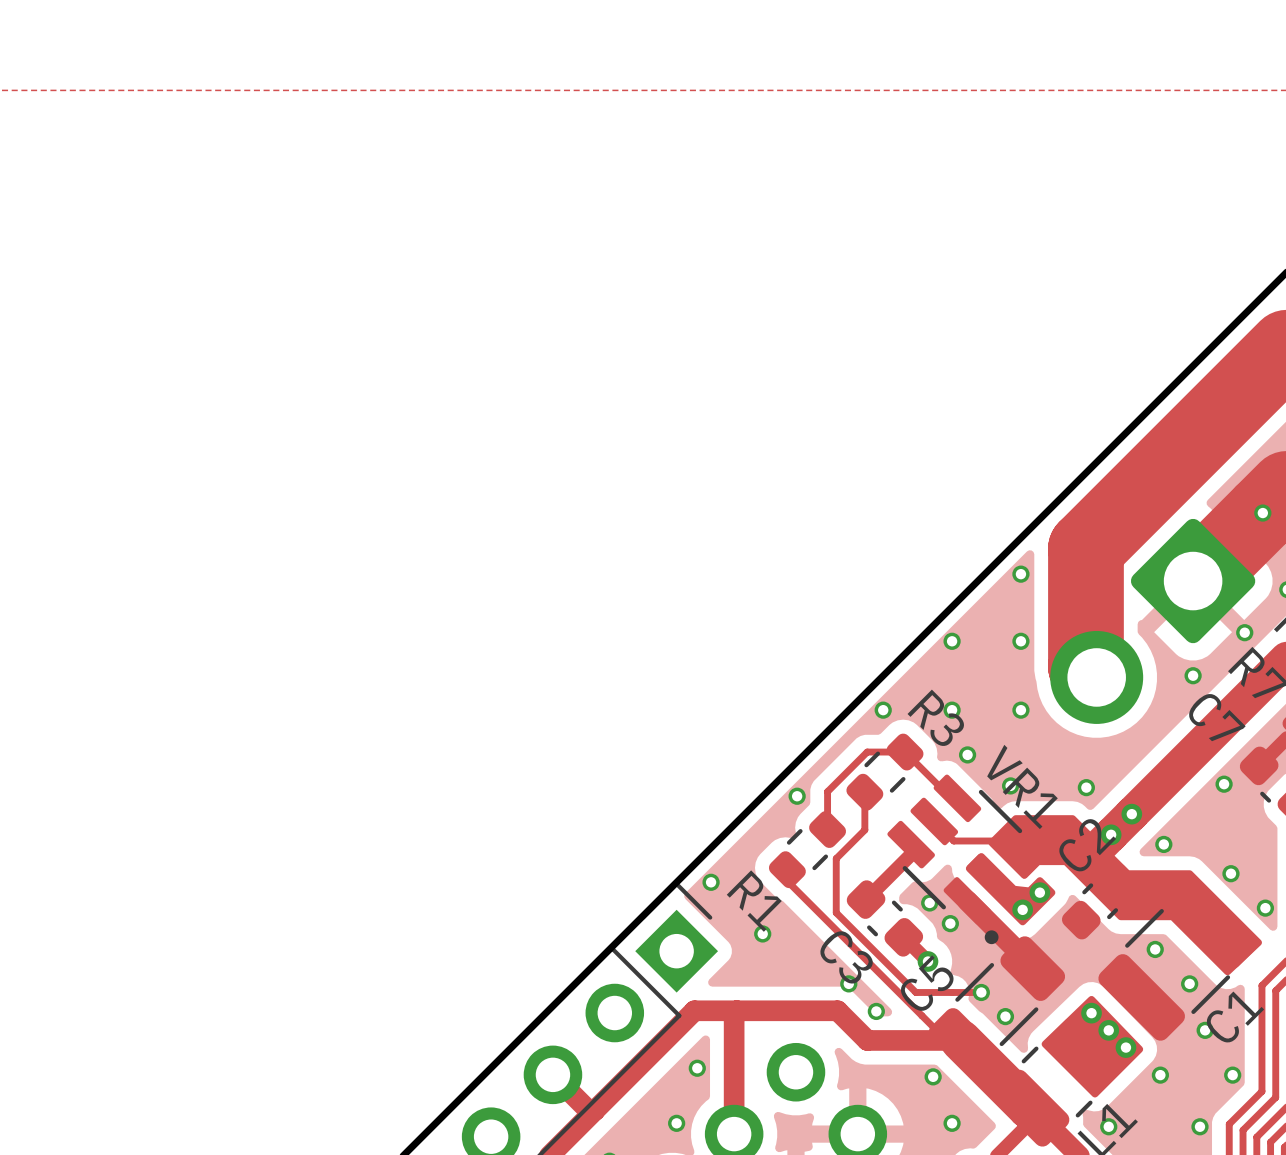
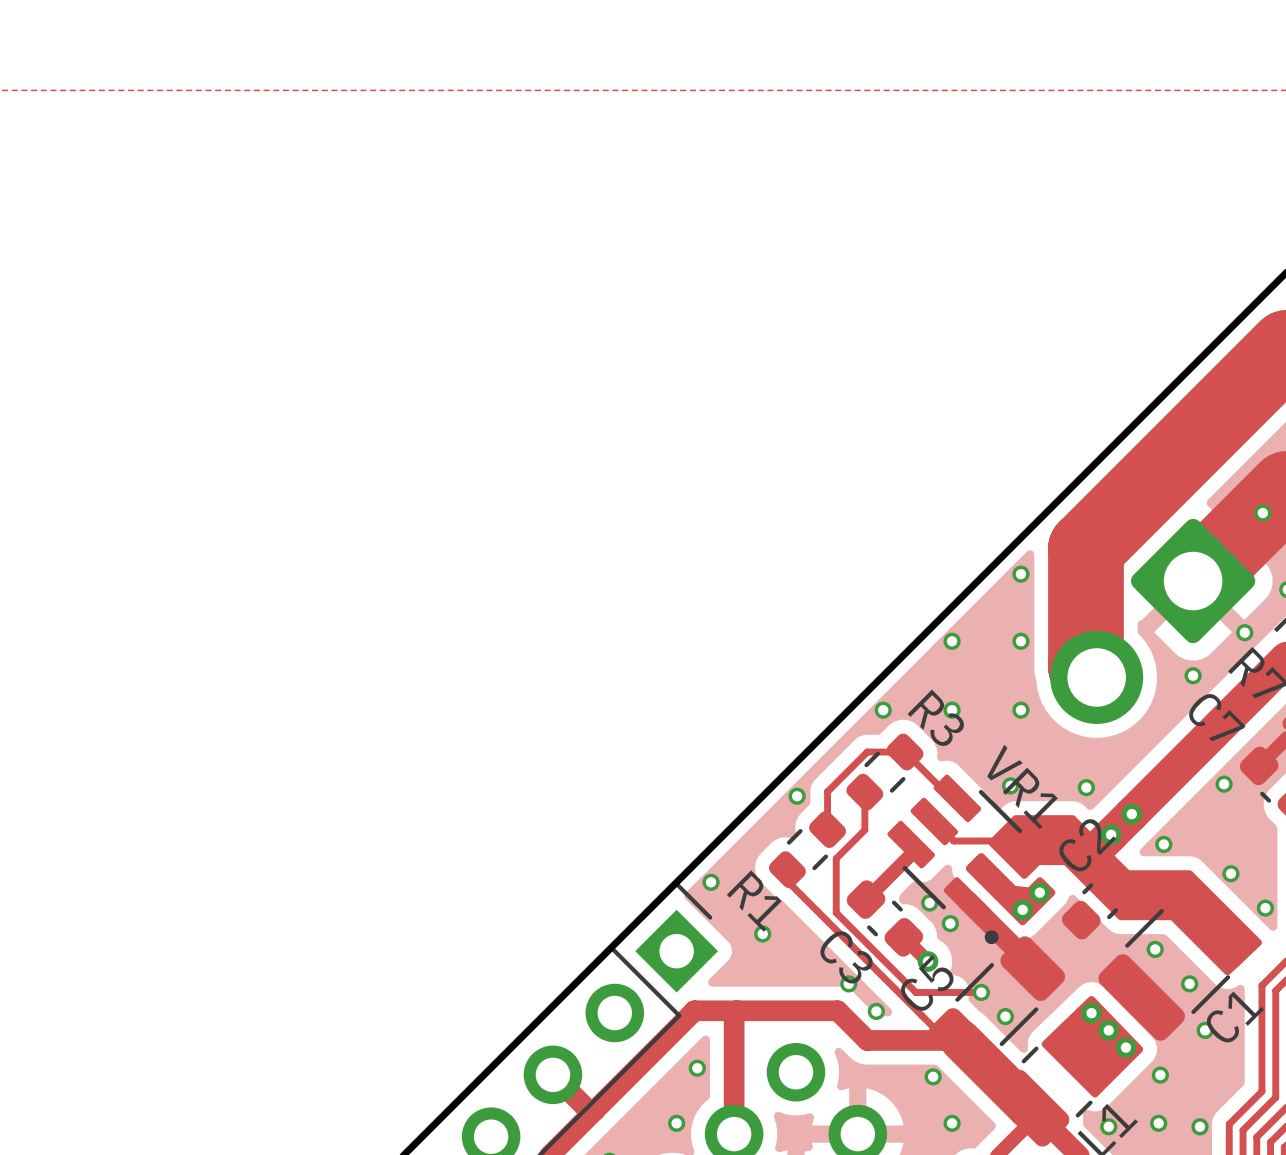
via: (967, 754) -> none
via position: (1232, 1075) -> (1158, 1123)

